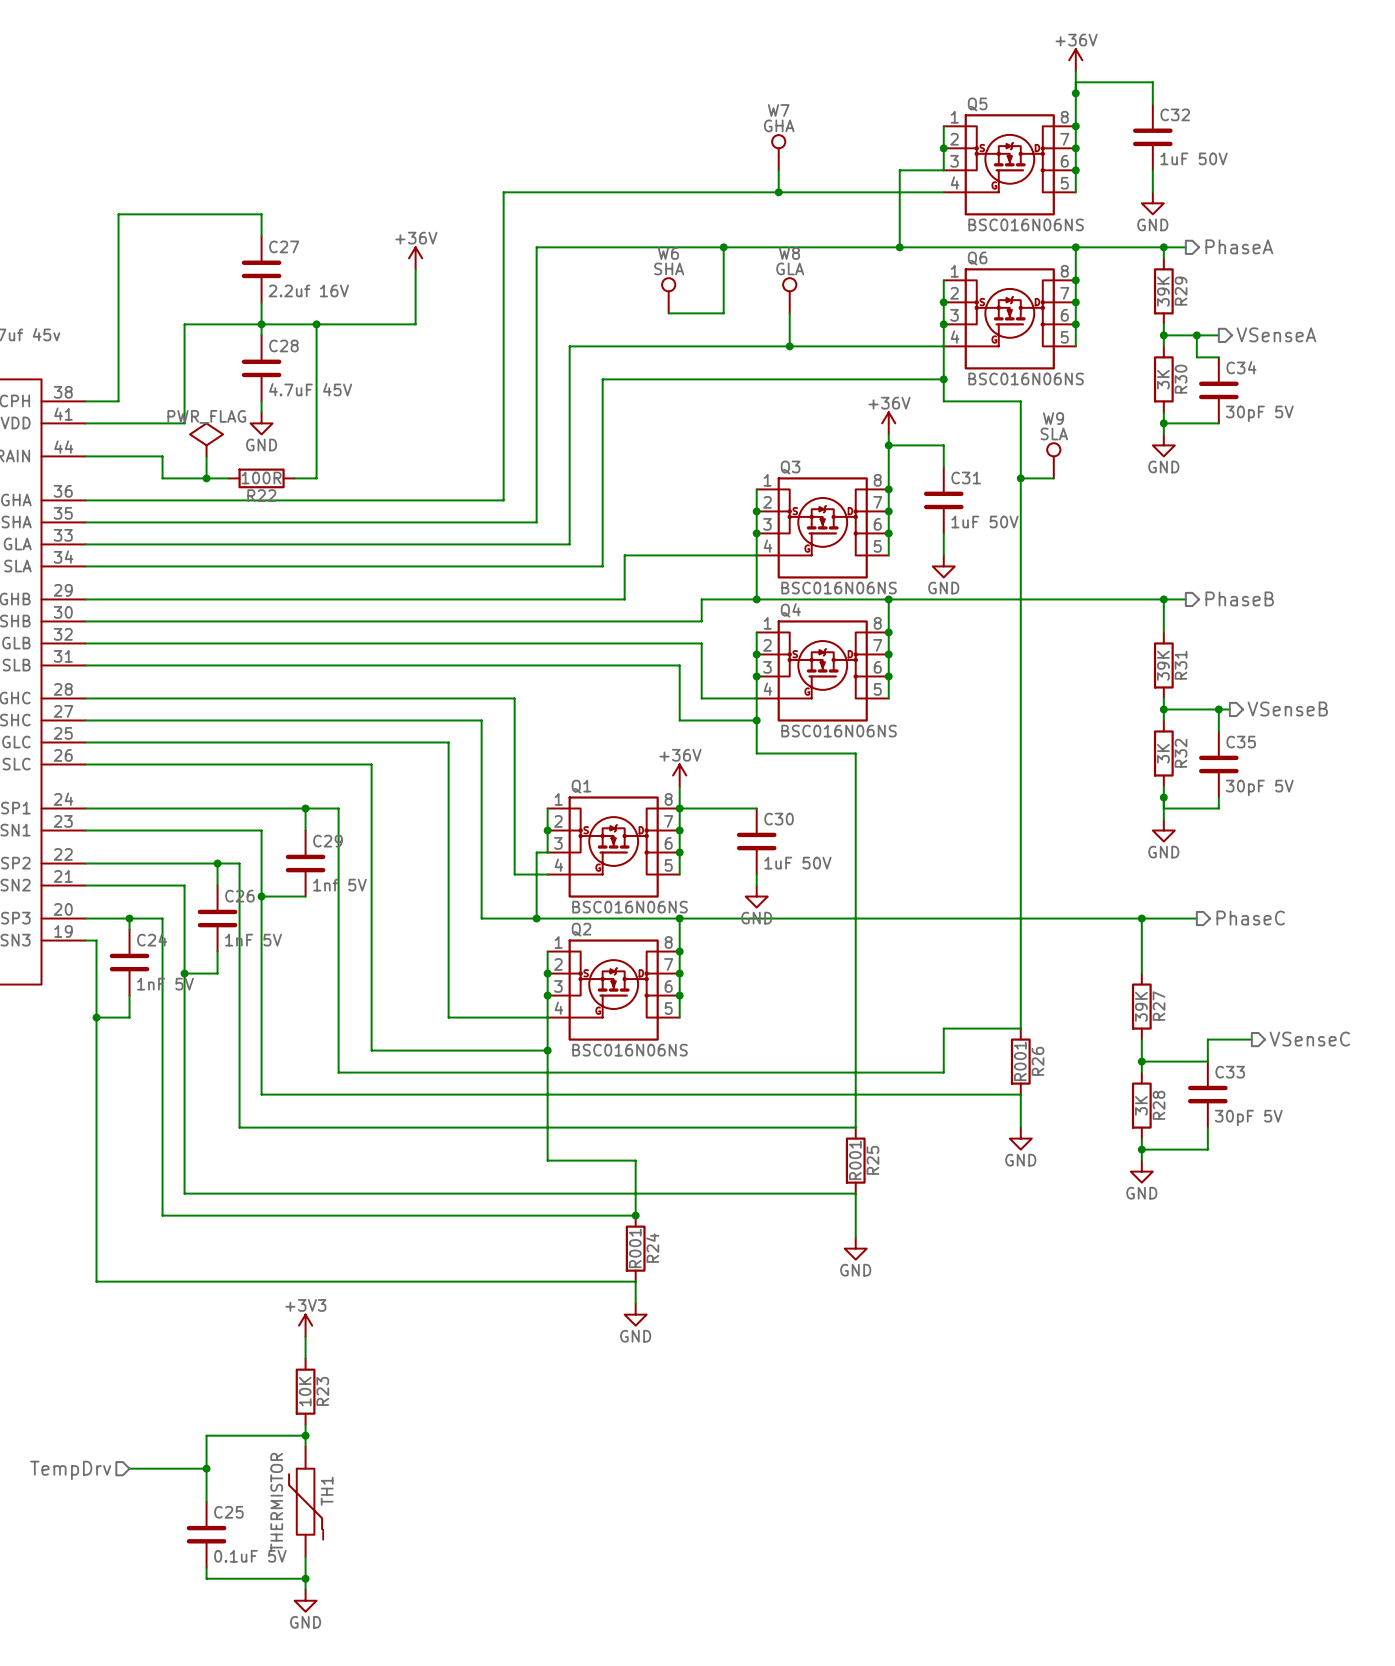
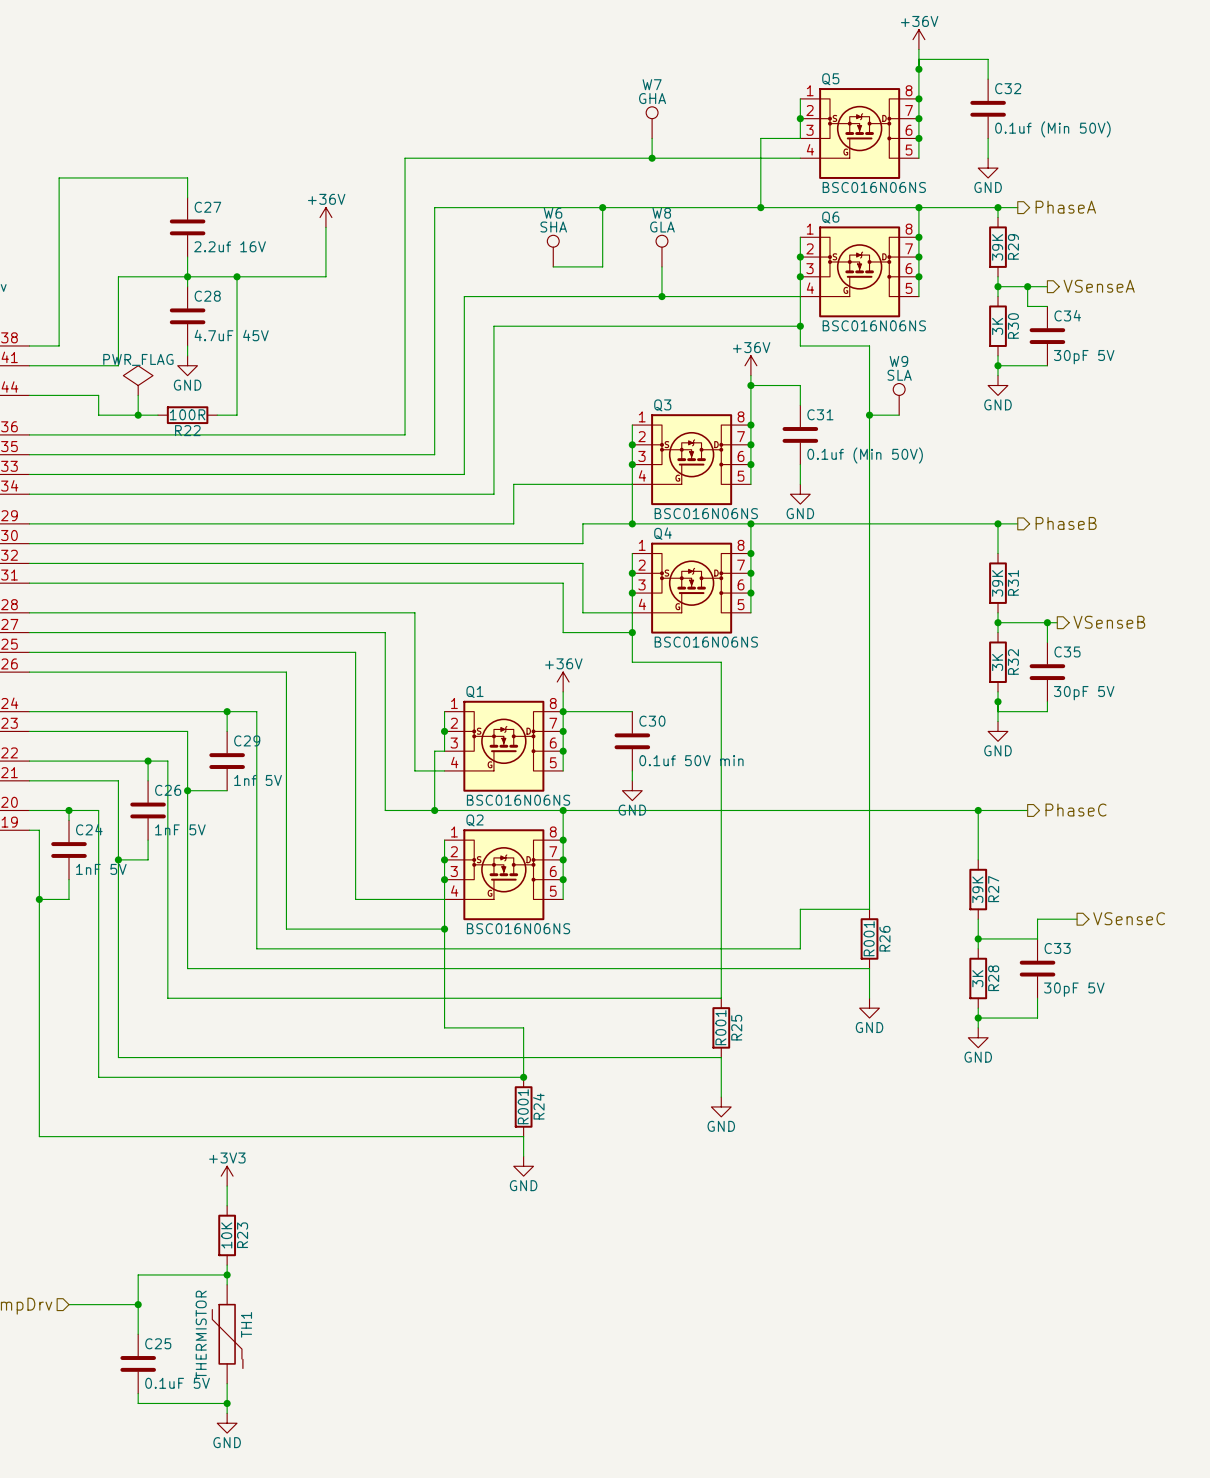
C32 value: 1uF 50V (1194, 158) -> 0.1uf (Min 50V) (1052, 129)
C31 value: 1uF 50V (984, 522) -> 0.1uf (Min 50V) (865, 455)
C30 value: 1uF 50V (797, 863) -> 0.1uf 50V min (691, 760)

